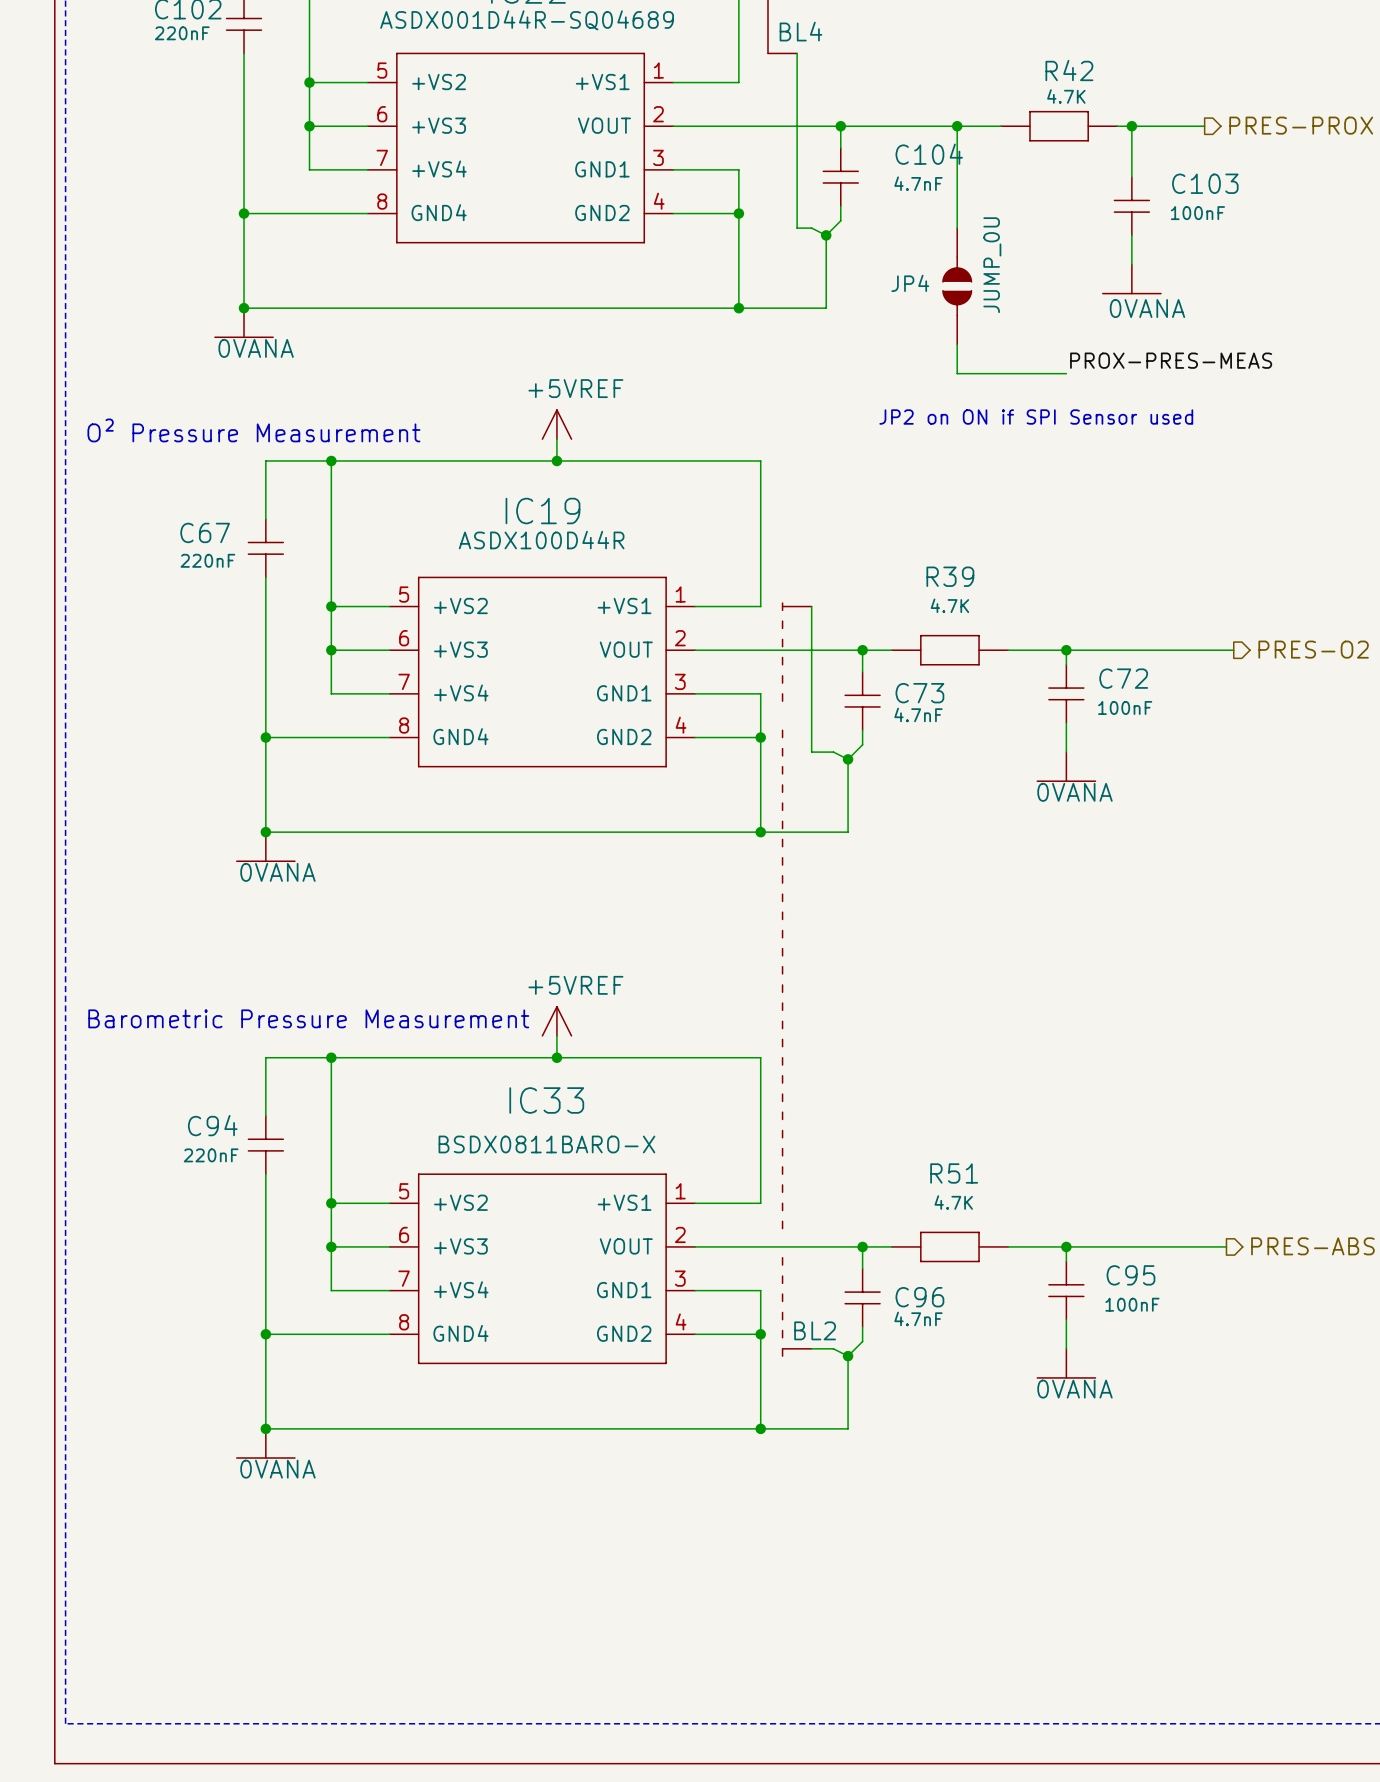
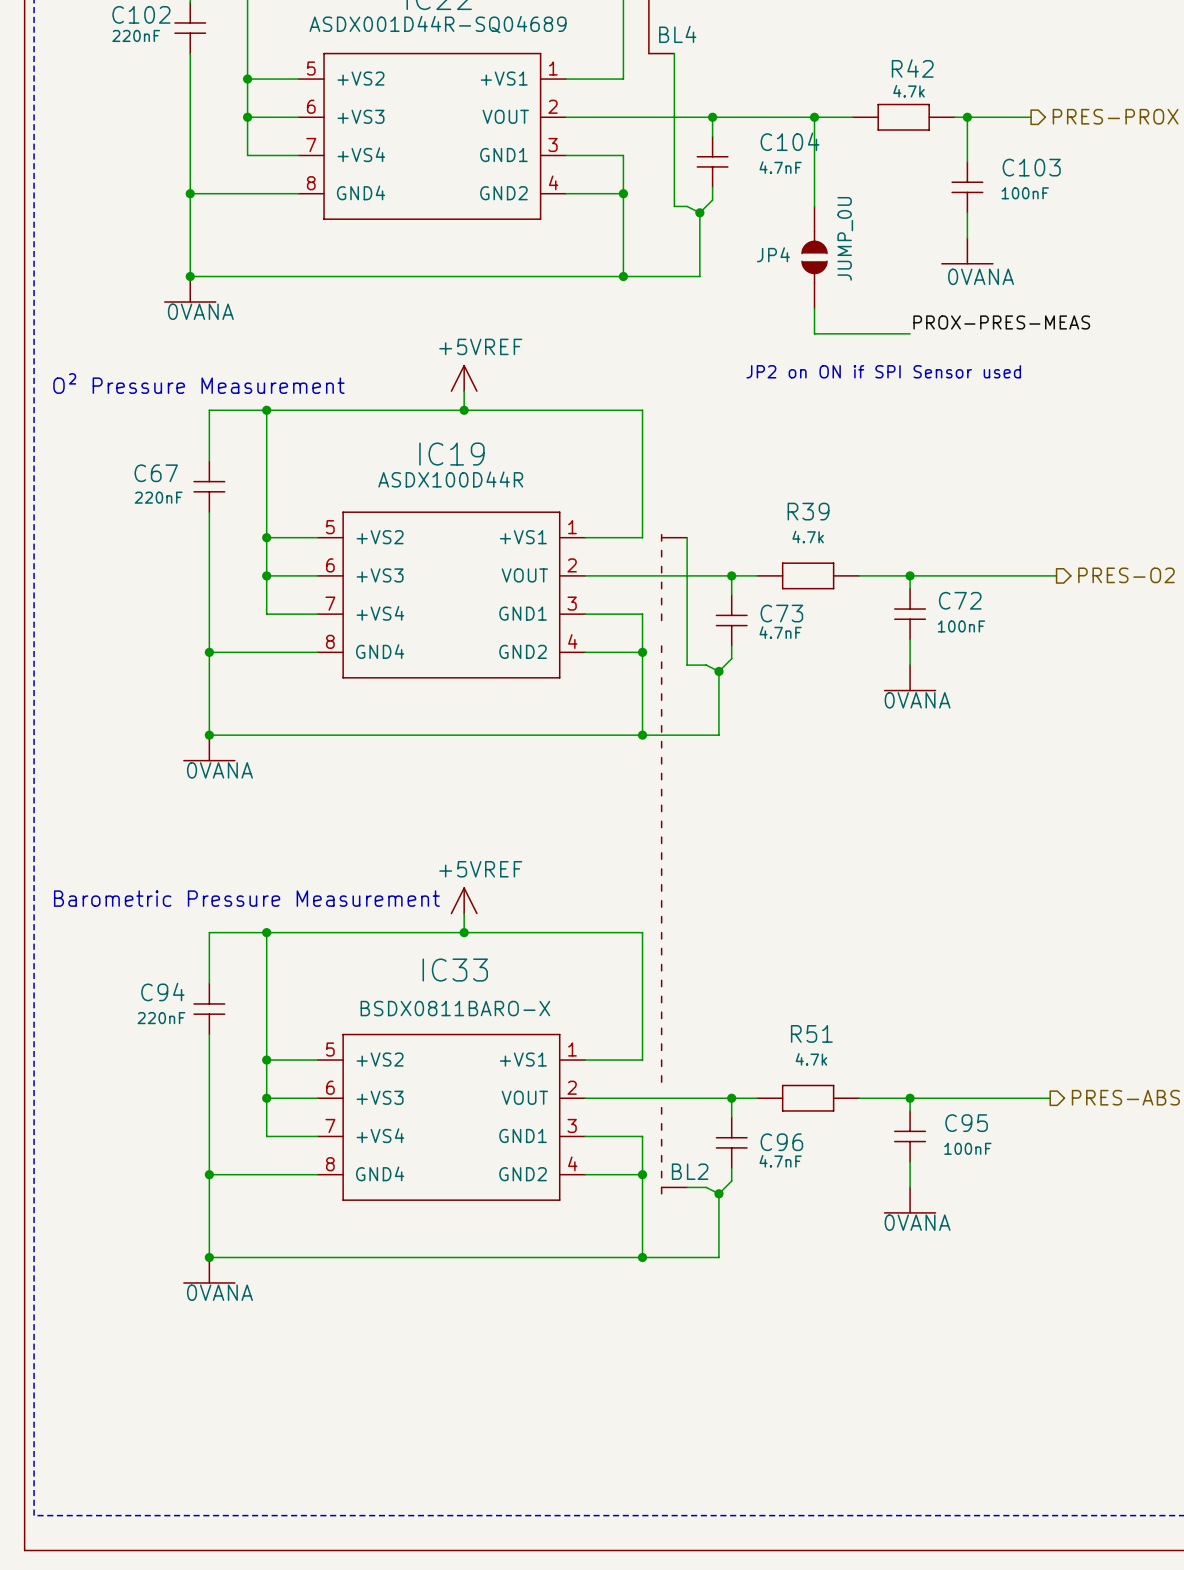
R42 value: 4.7K (1066, 96) -> 4.7k (909, 91)
R39 value: 4.7K (949, 605) -> 4.7k (808, 537)
R51 value: 4.7K (953, 1202) -> 4.7k (811, 1059)

